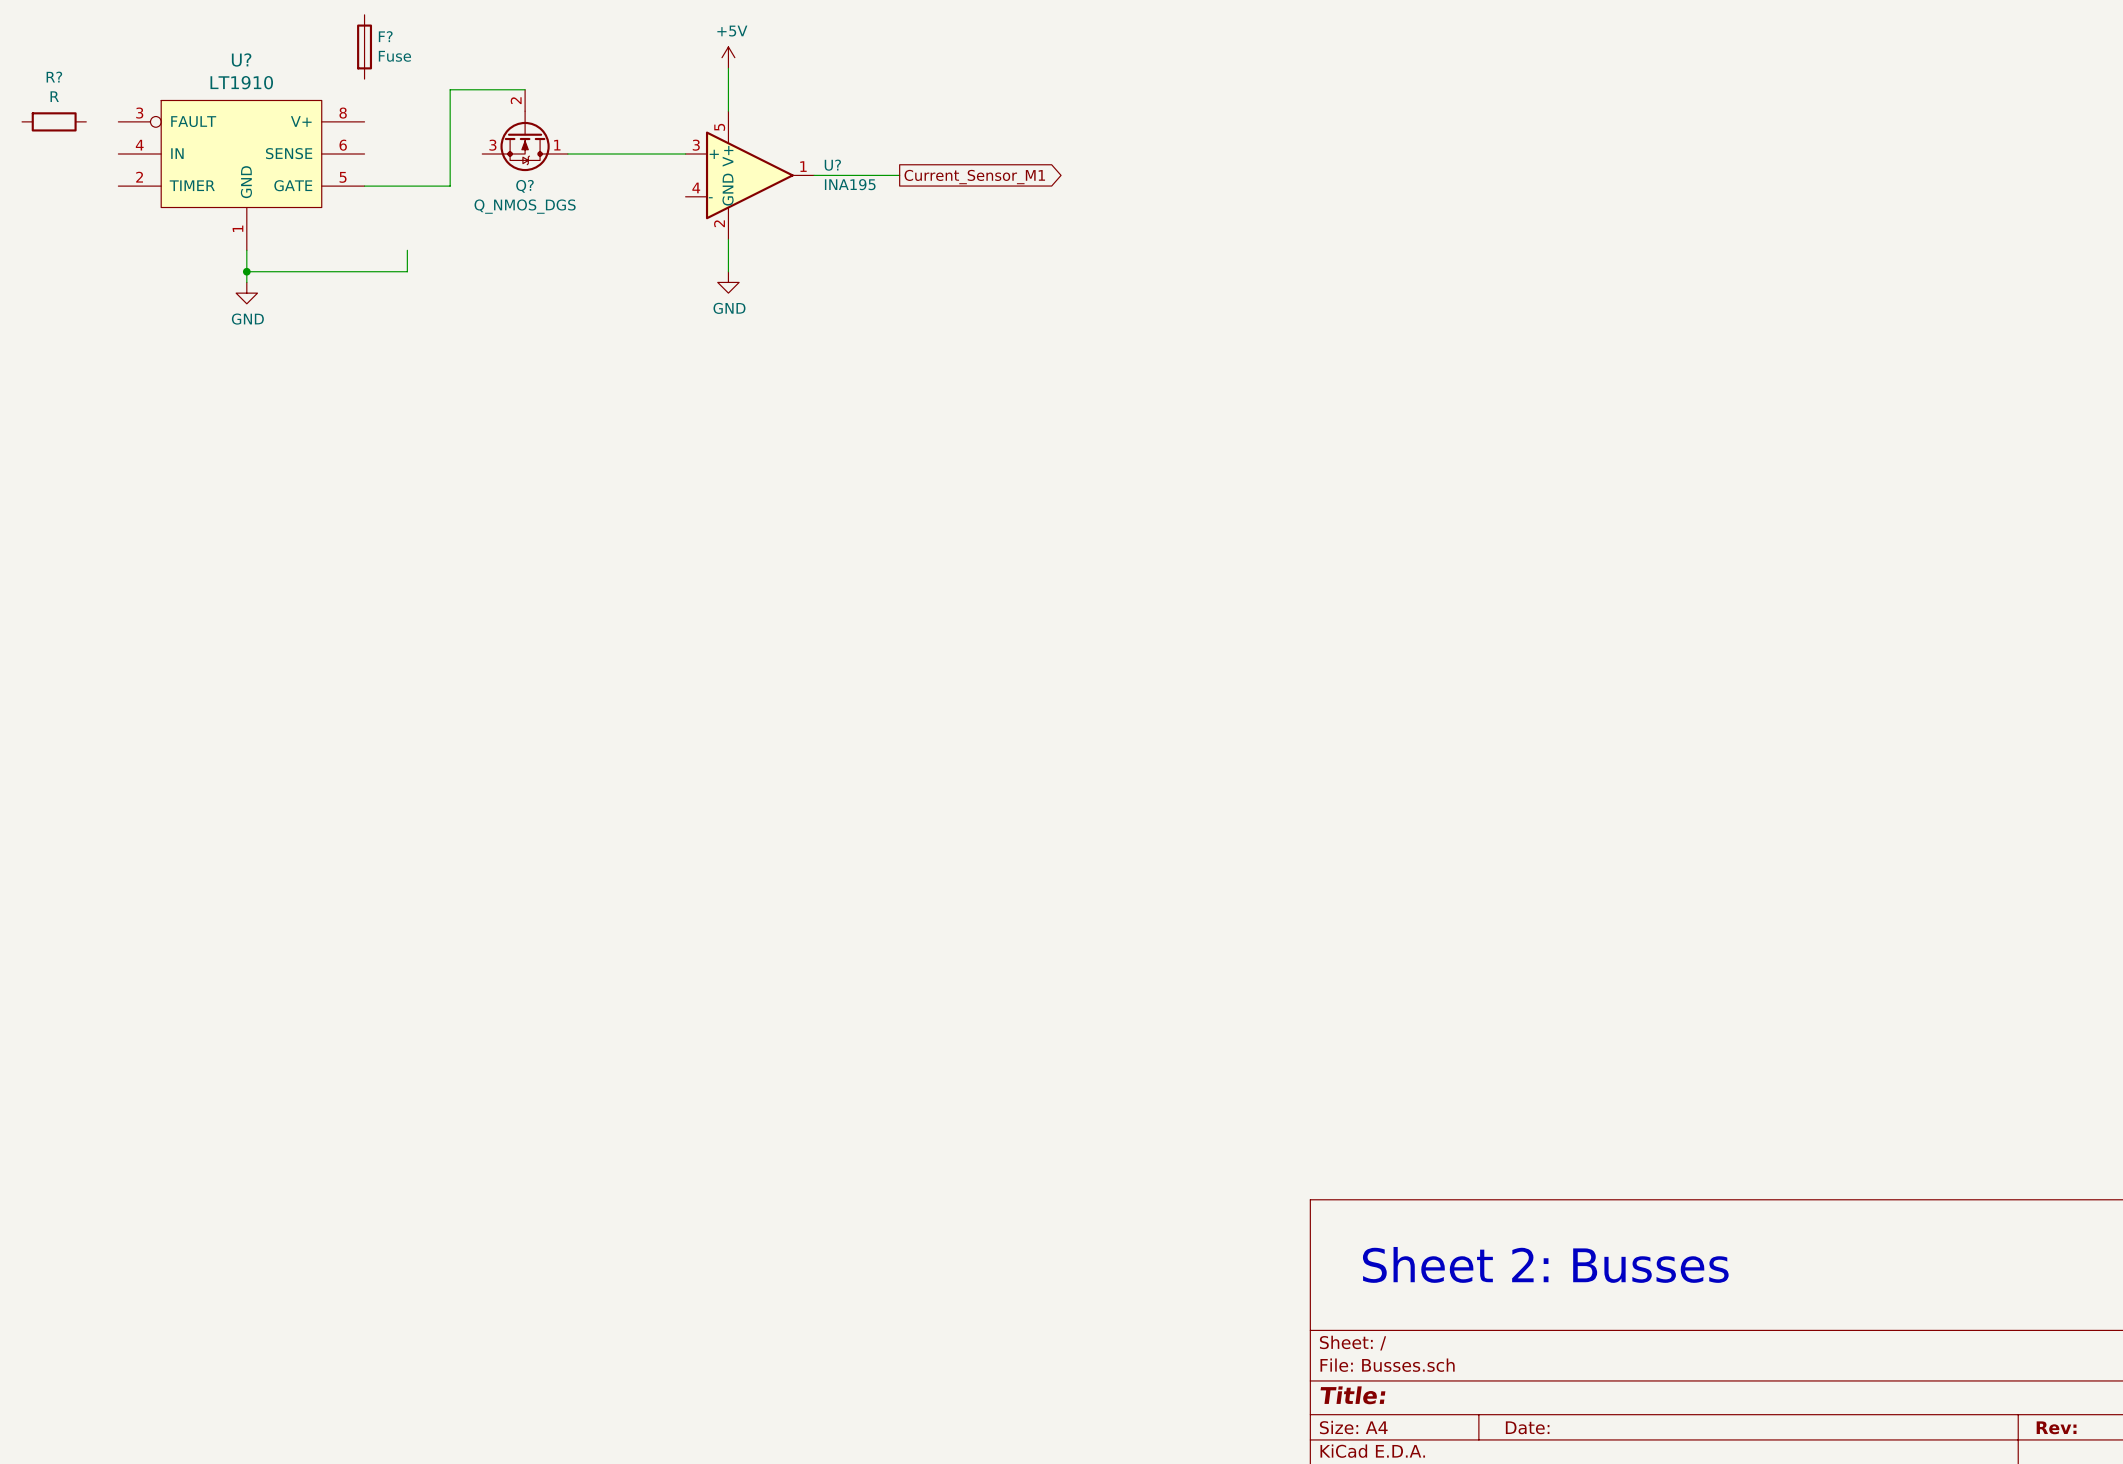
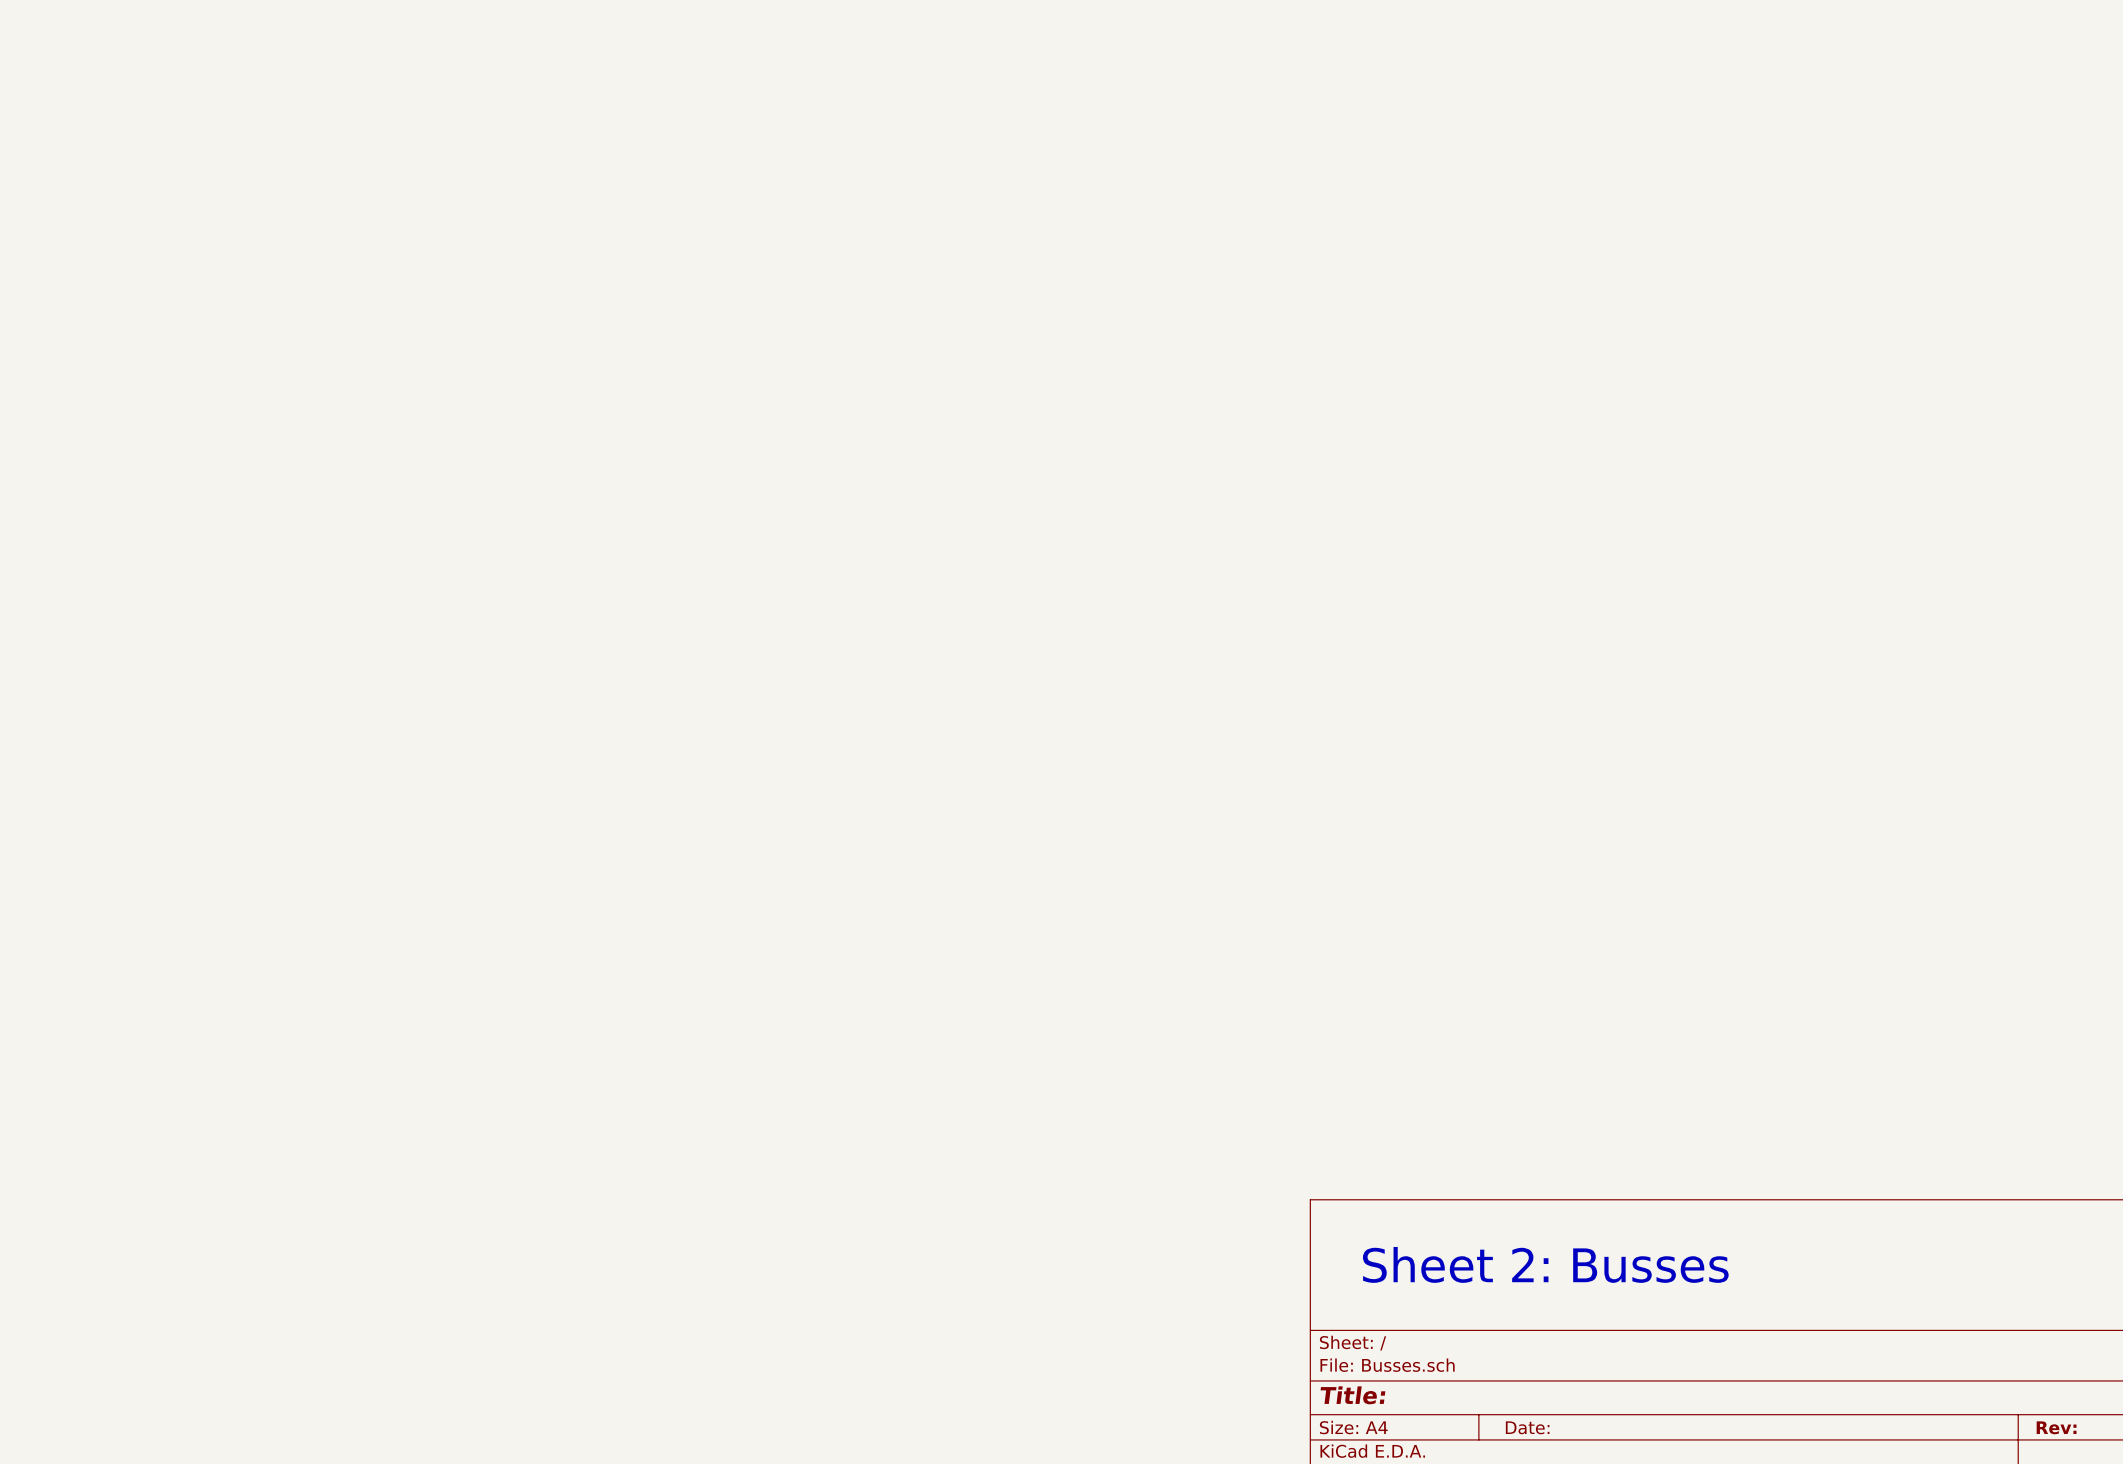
F?: Fuse (364, 46) -> none
power symbol: +5V (728, 57) -> none
wire: (728, 68) (728, 111) -> none
wire: (525, 89) (450, 89) (450, 186) (364, 186) -> none
R?: R (54, 121) -> none
Q?: Q_NMOS_DGS (525, 130) -> none
wire: (567, 153) (685, 153) -> none
U?: LT1910 (241, 175) -> none
U?: INA195 (749, 175) -> none
wire: (814, 175) (899, 175) -> none
global label: Current_Sensor_M1 (974, 177) -> none
wire: (728, 239) (728, 271) -> none
wire: (246, 250) (246, 282) -> none
wire: (407, 250) (407, 271) (246, 271) -> none
junction: (246, 271) -> none
power symbol: GND (728, 282) -> none
power symbol: GND (246, 293) -> none

